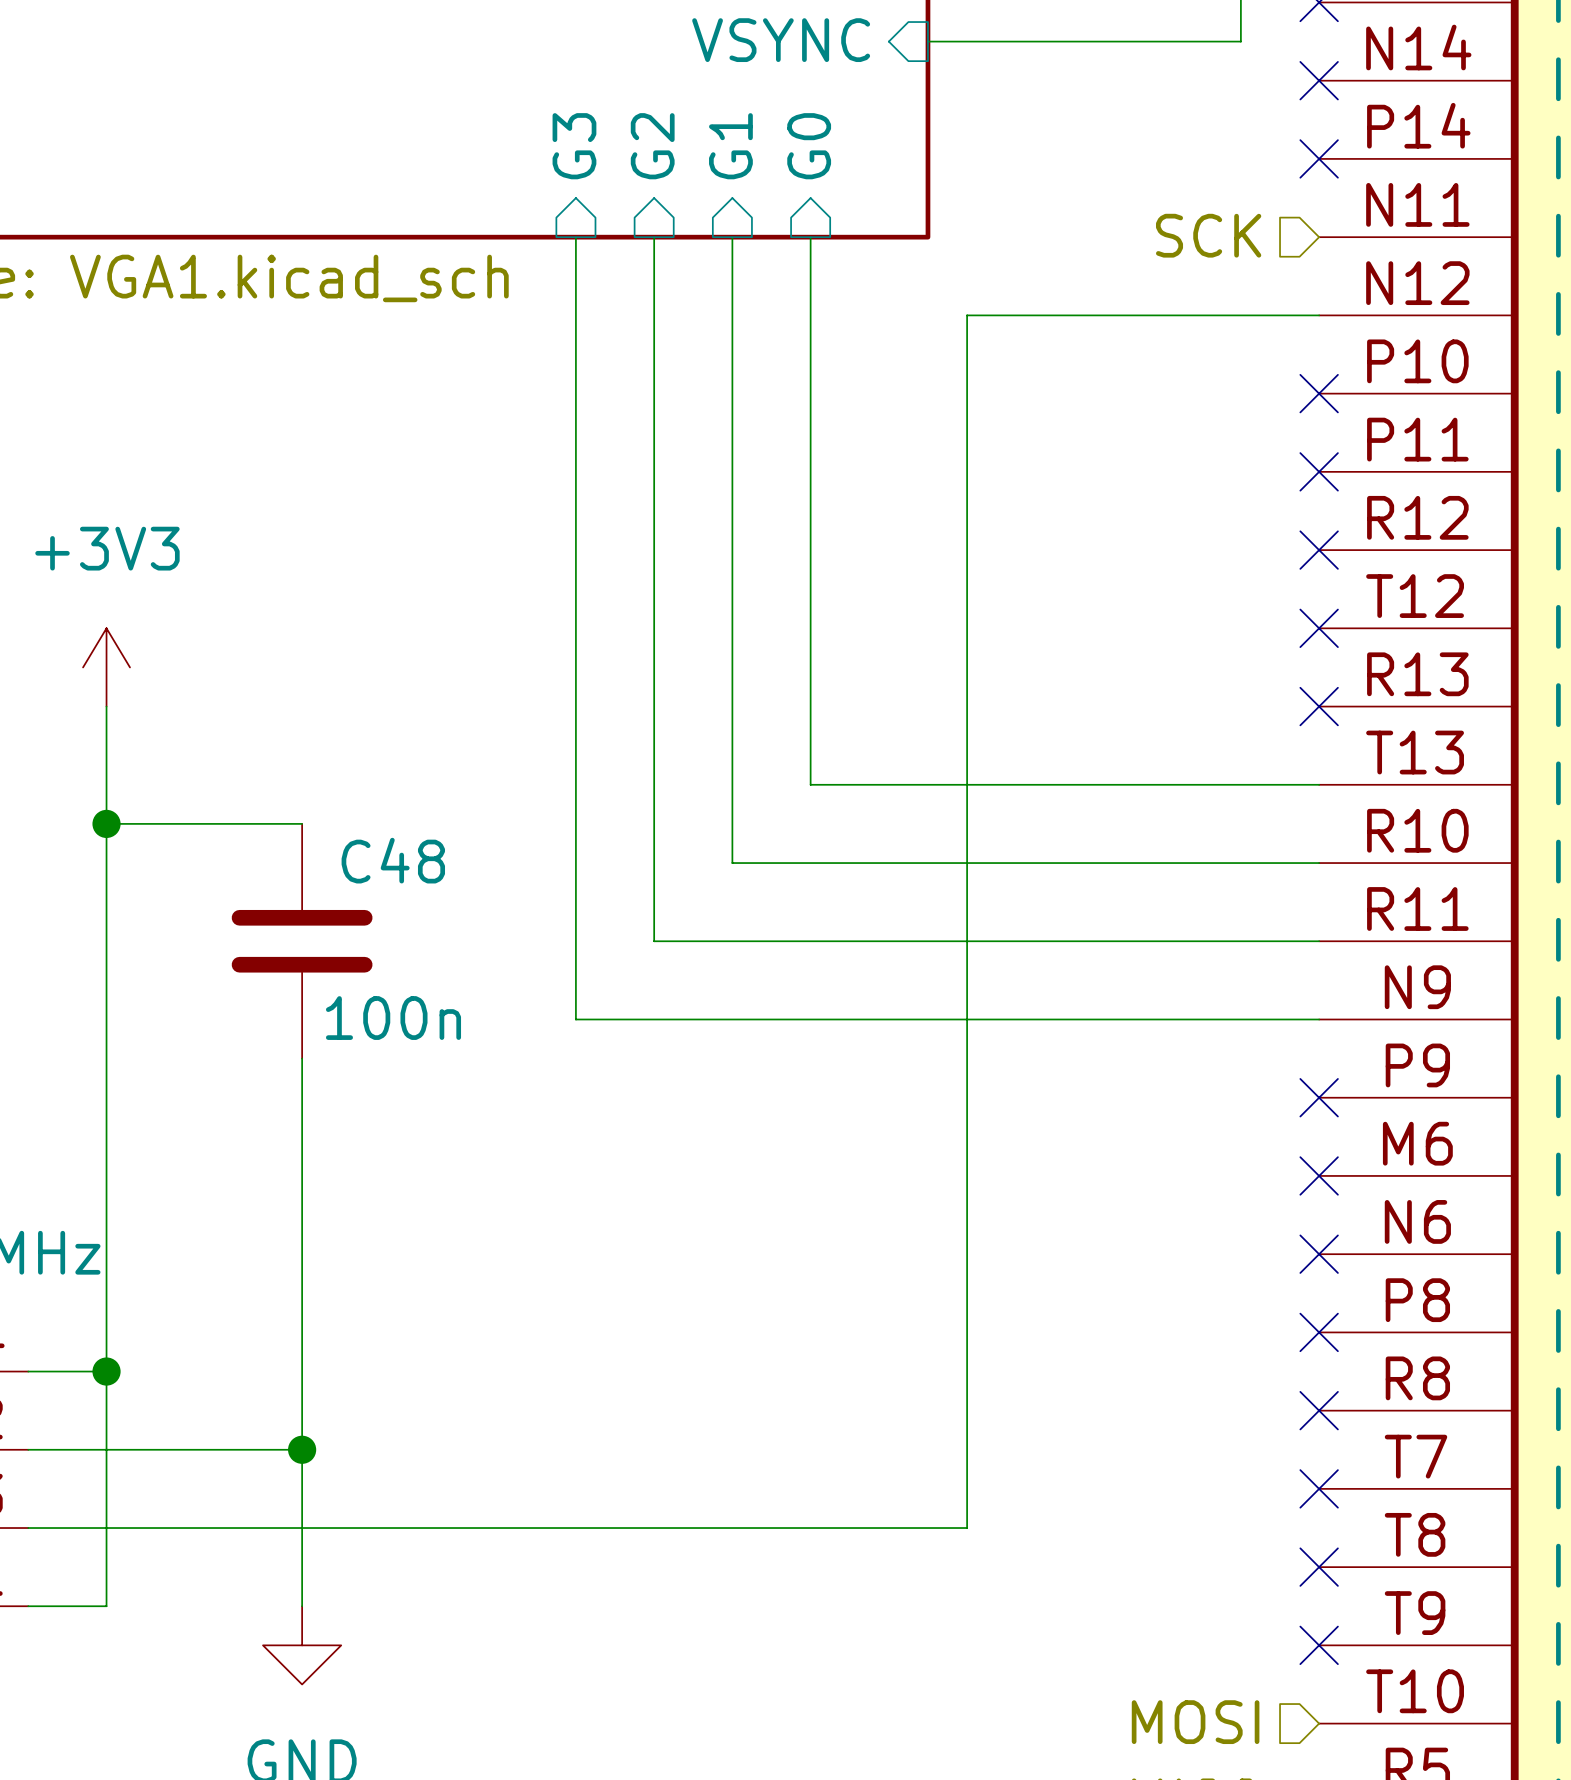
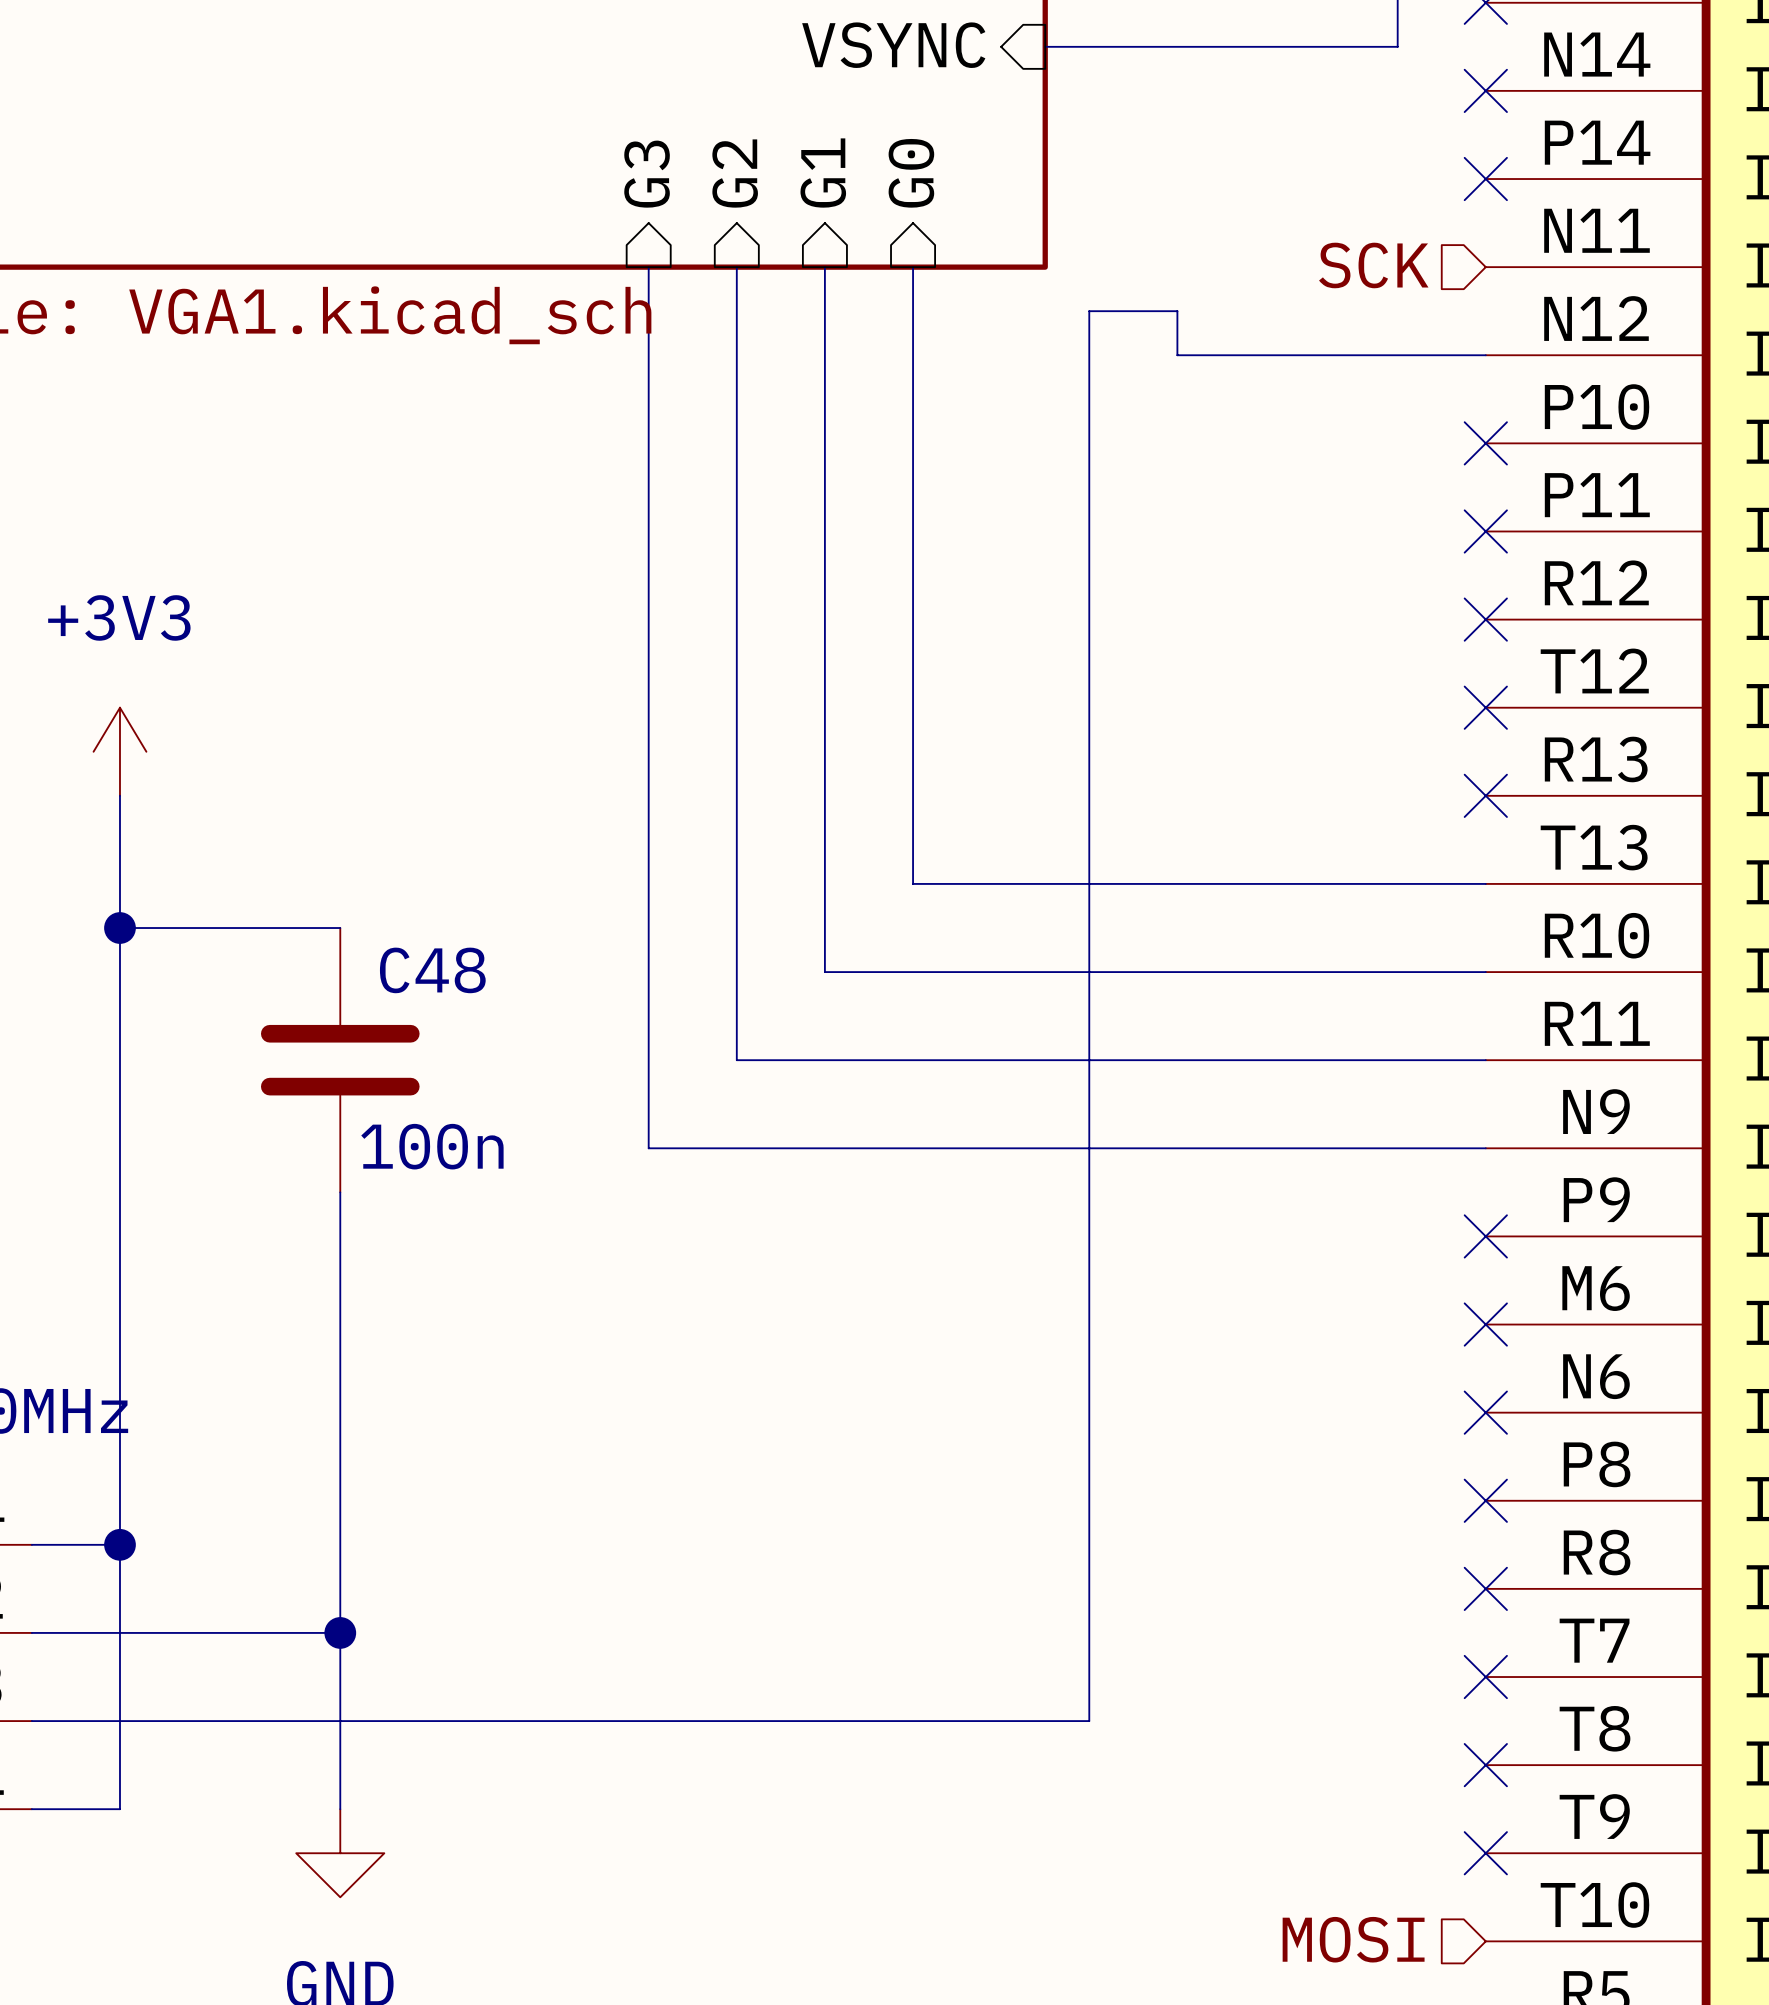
wire: (967, 315) (1045, 315) -> (1089, 355) (1089, 311) (1177, 311) (1177, 355)

